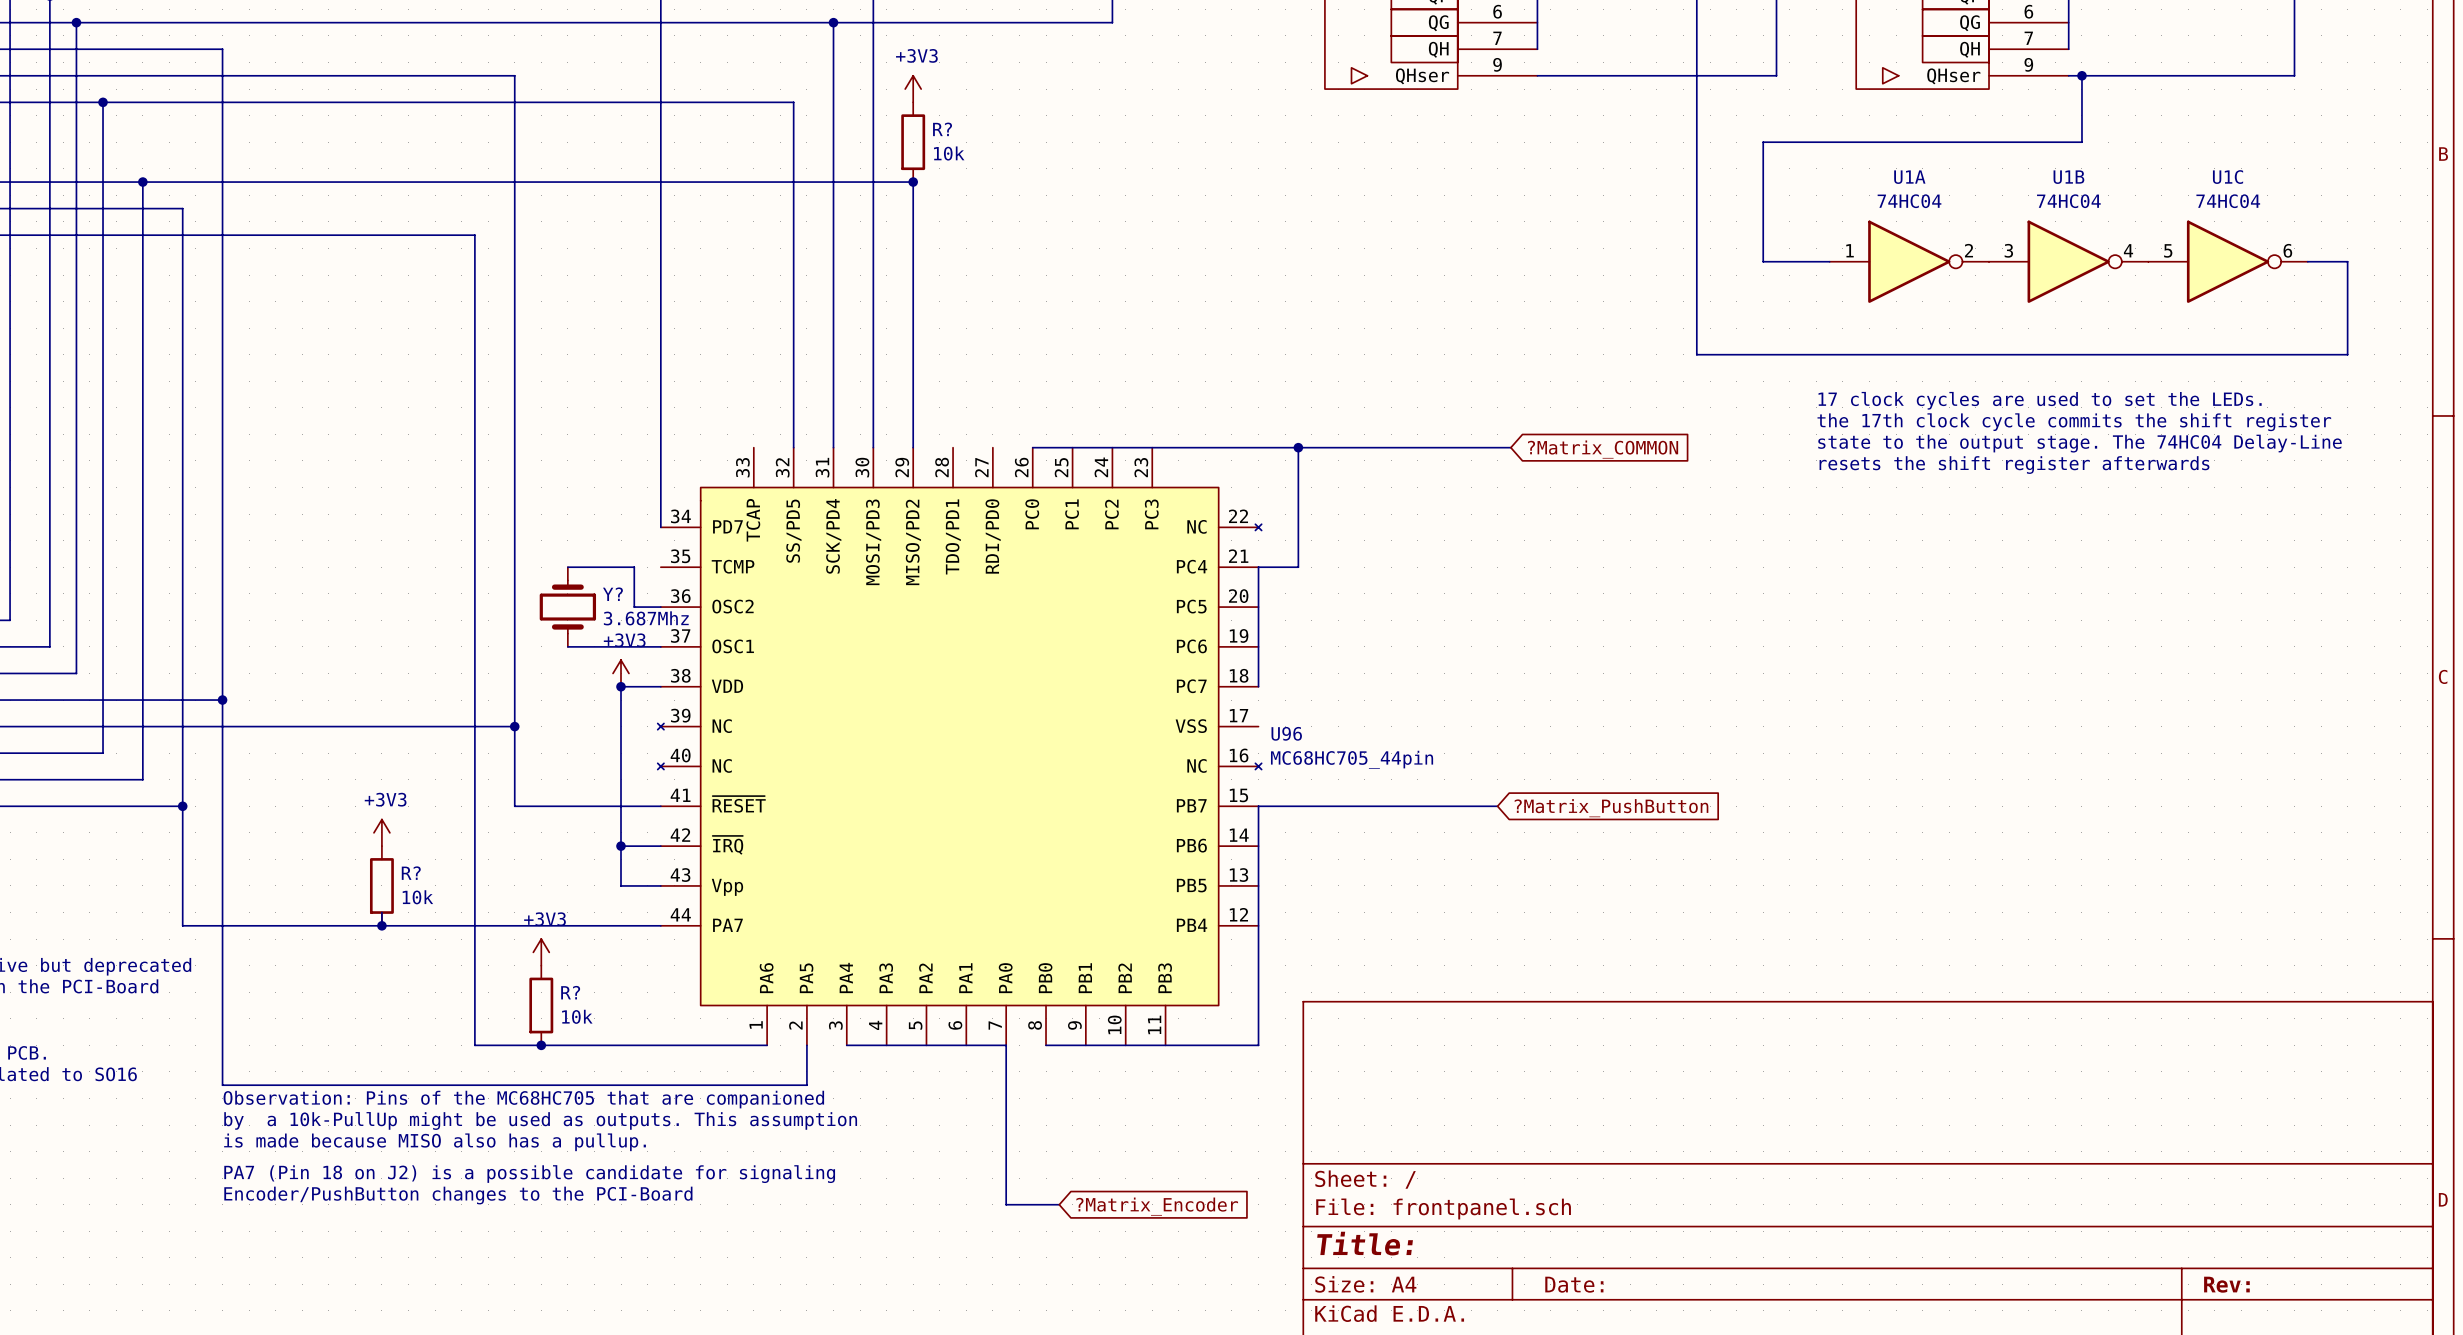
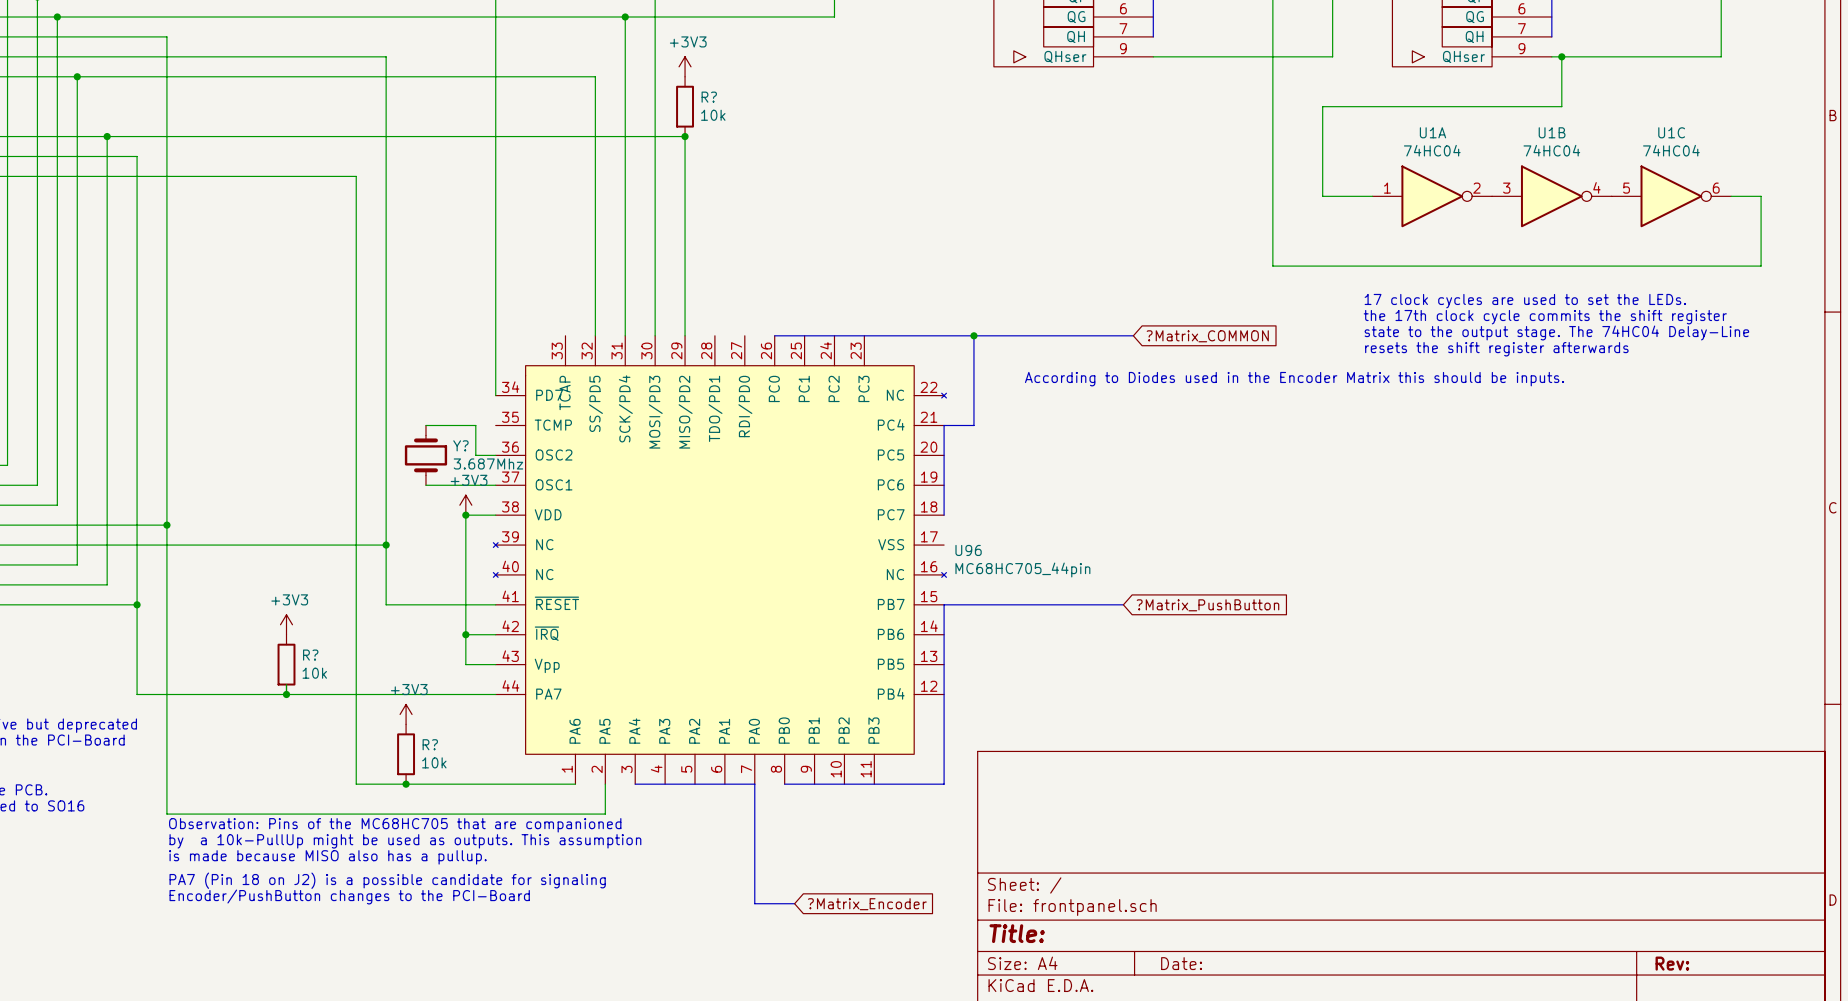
text: none -> According to Diodes used in the Encoder Matrix this should be inputs. (1294, 379)

